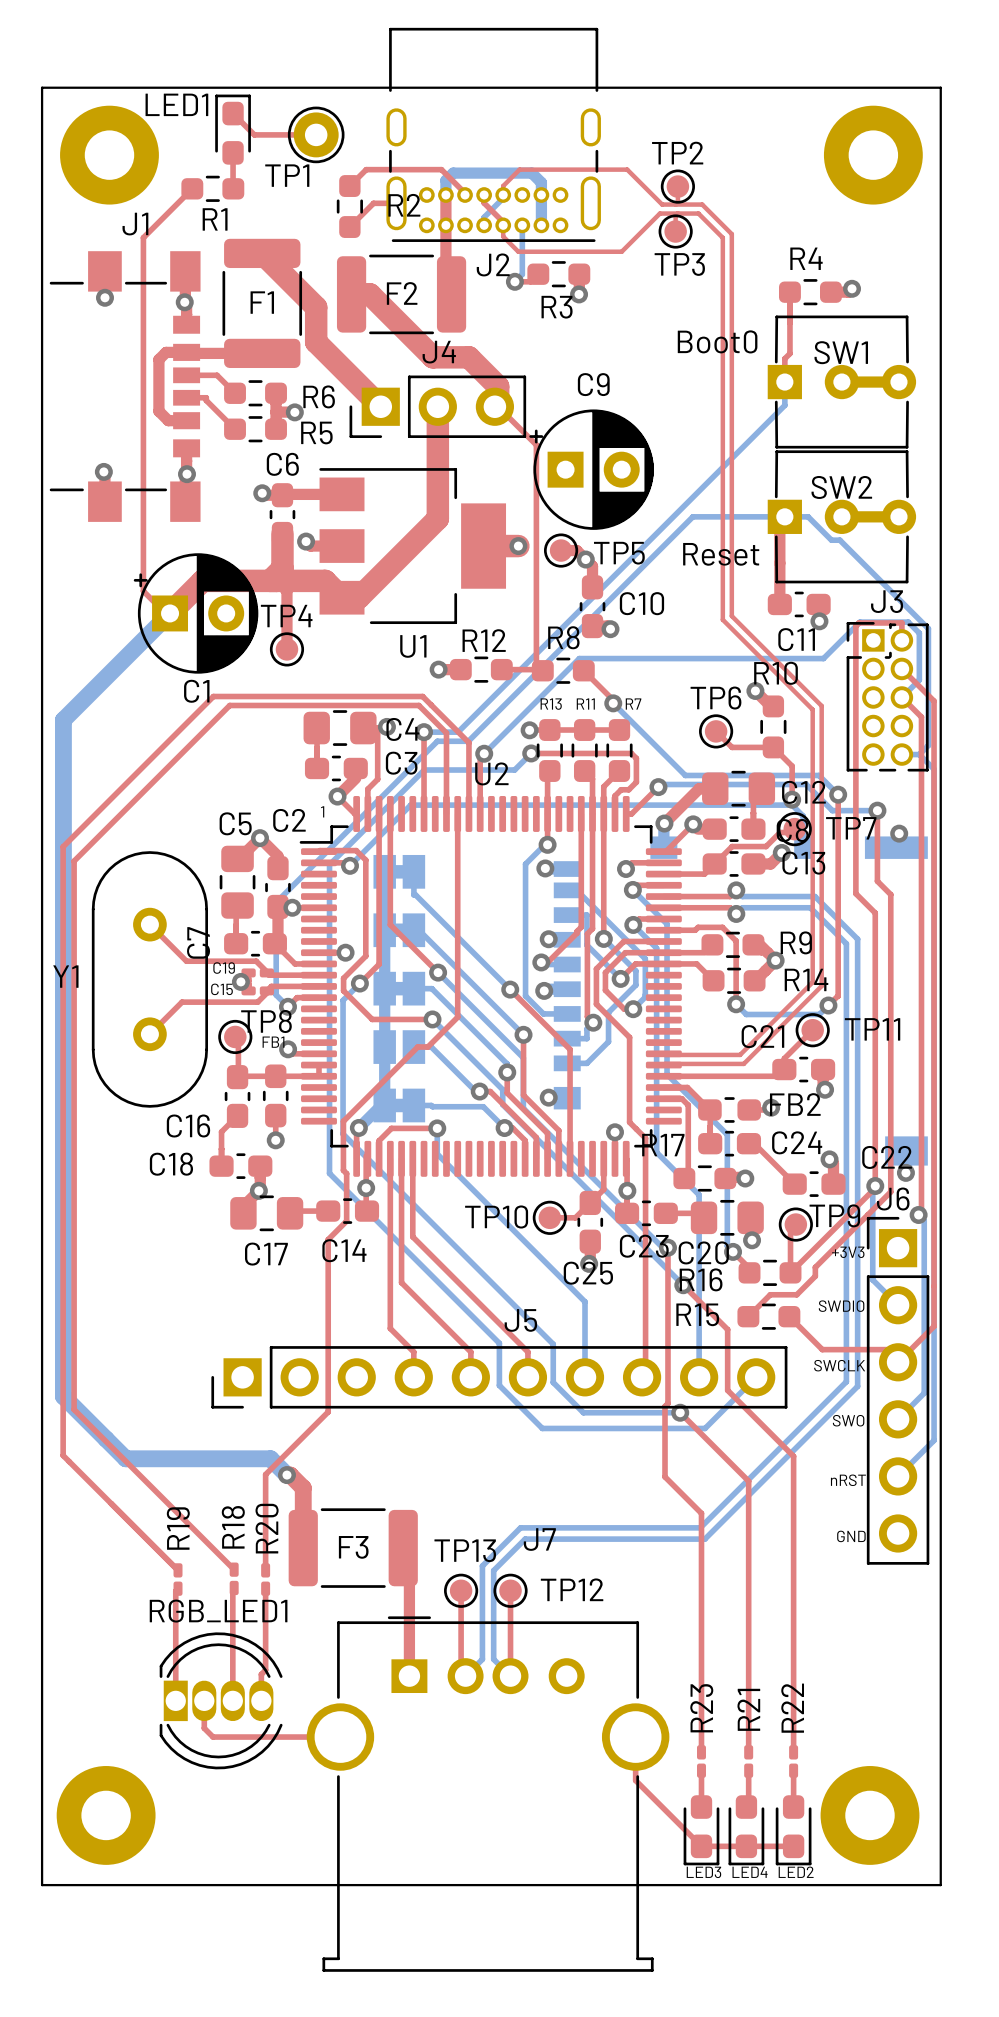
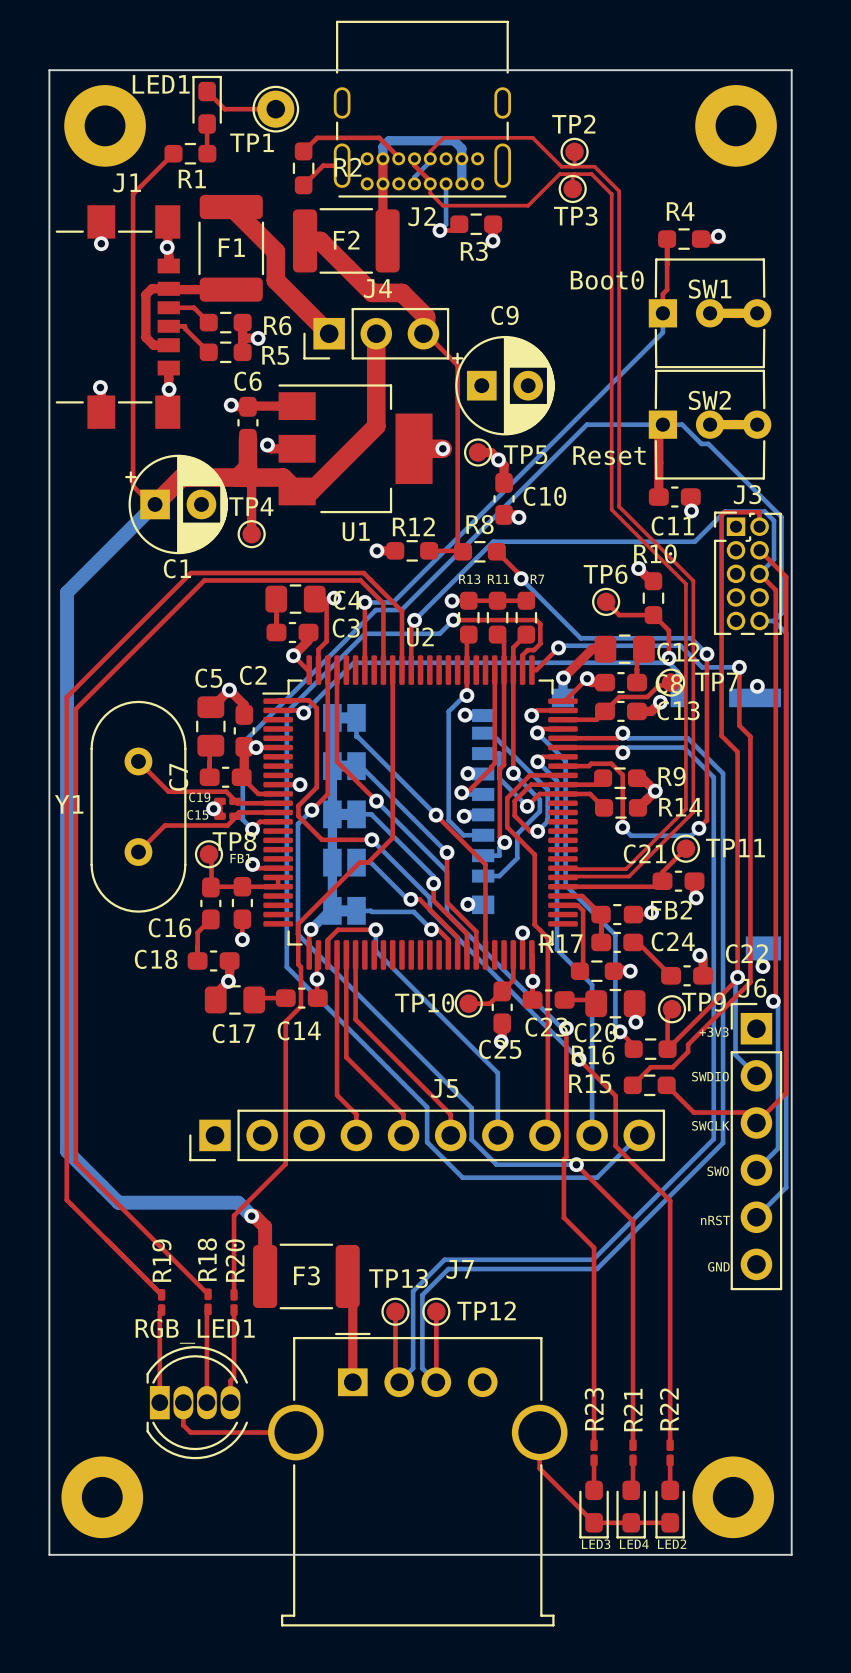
text: 1 (322, 811) -> none

